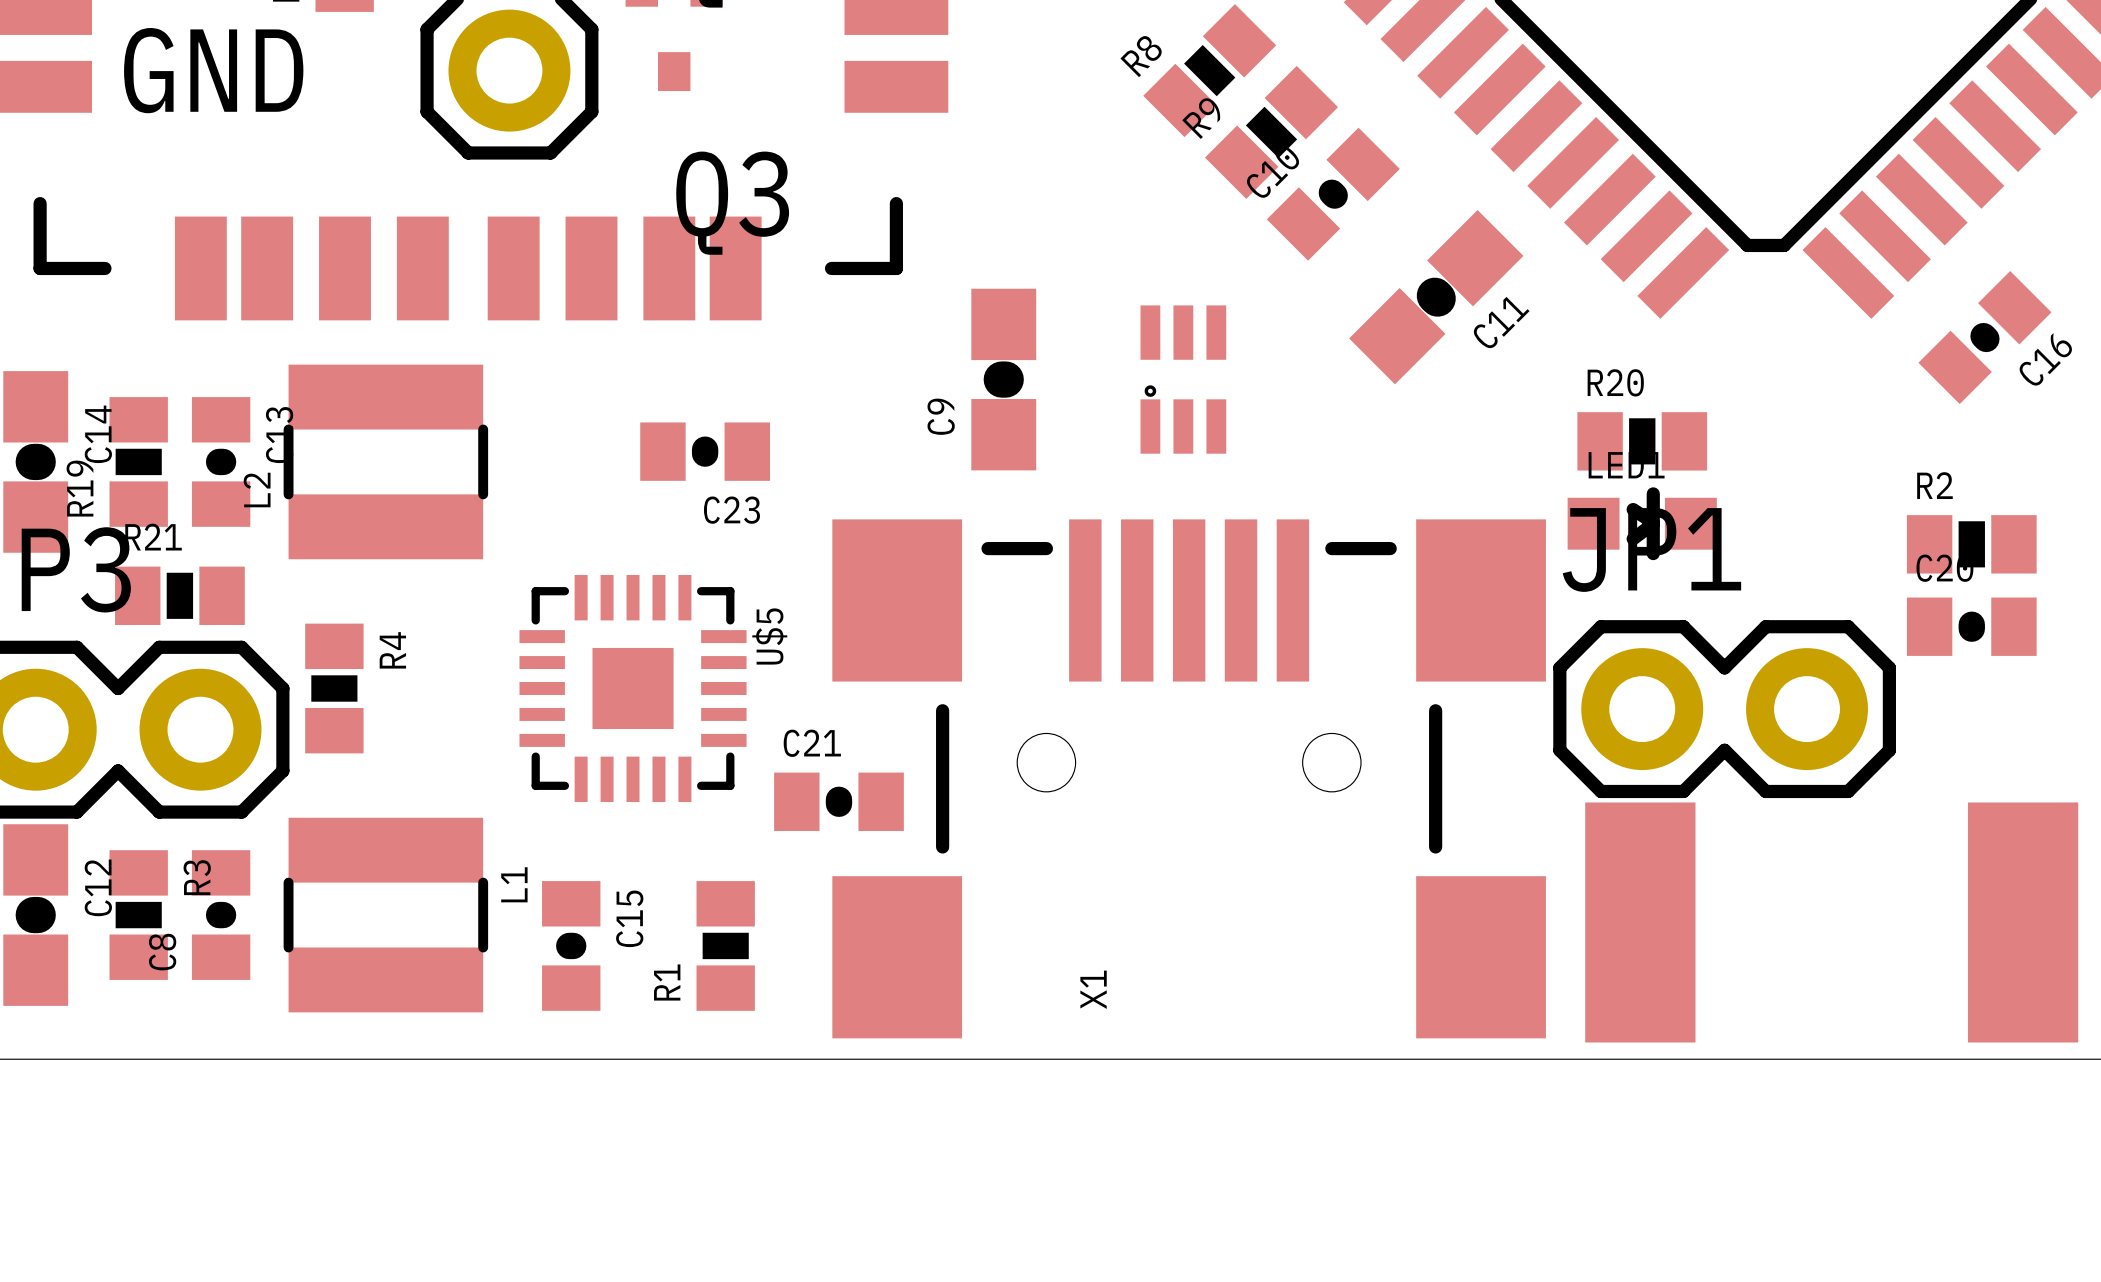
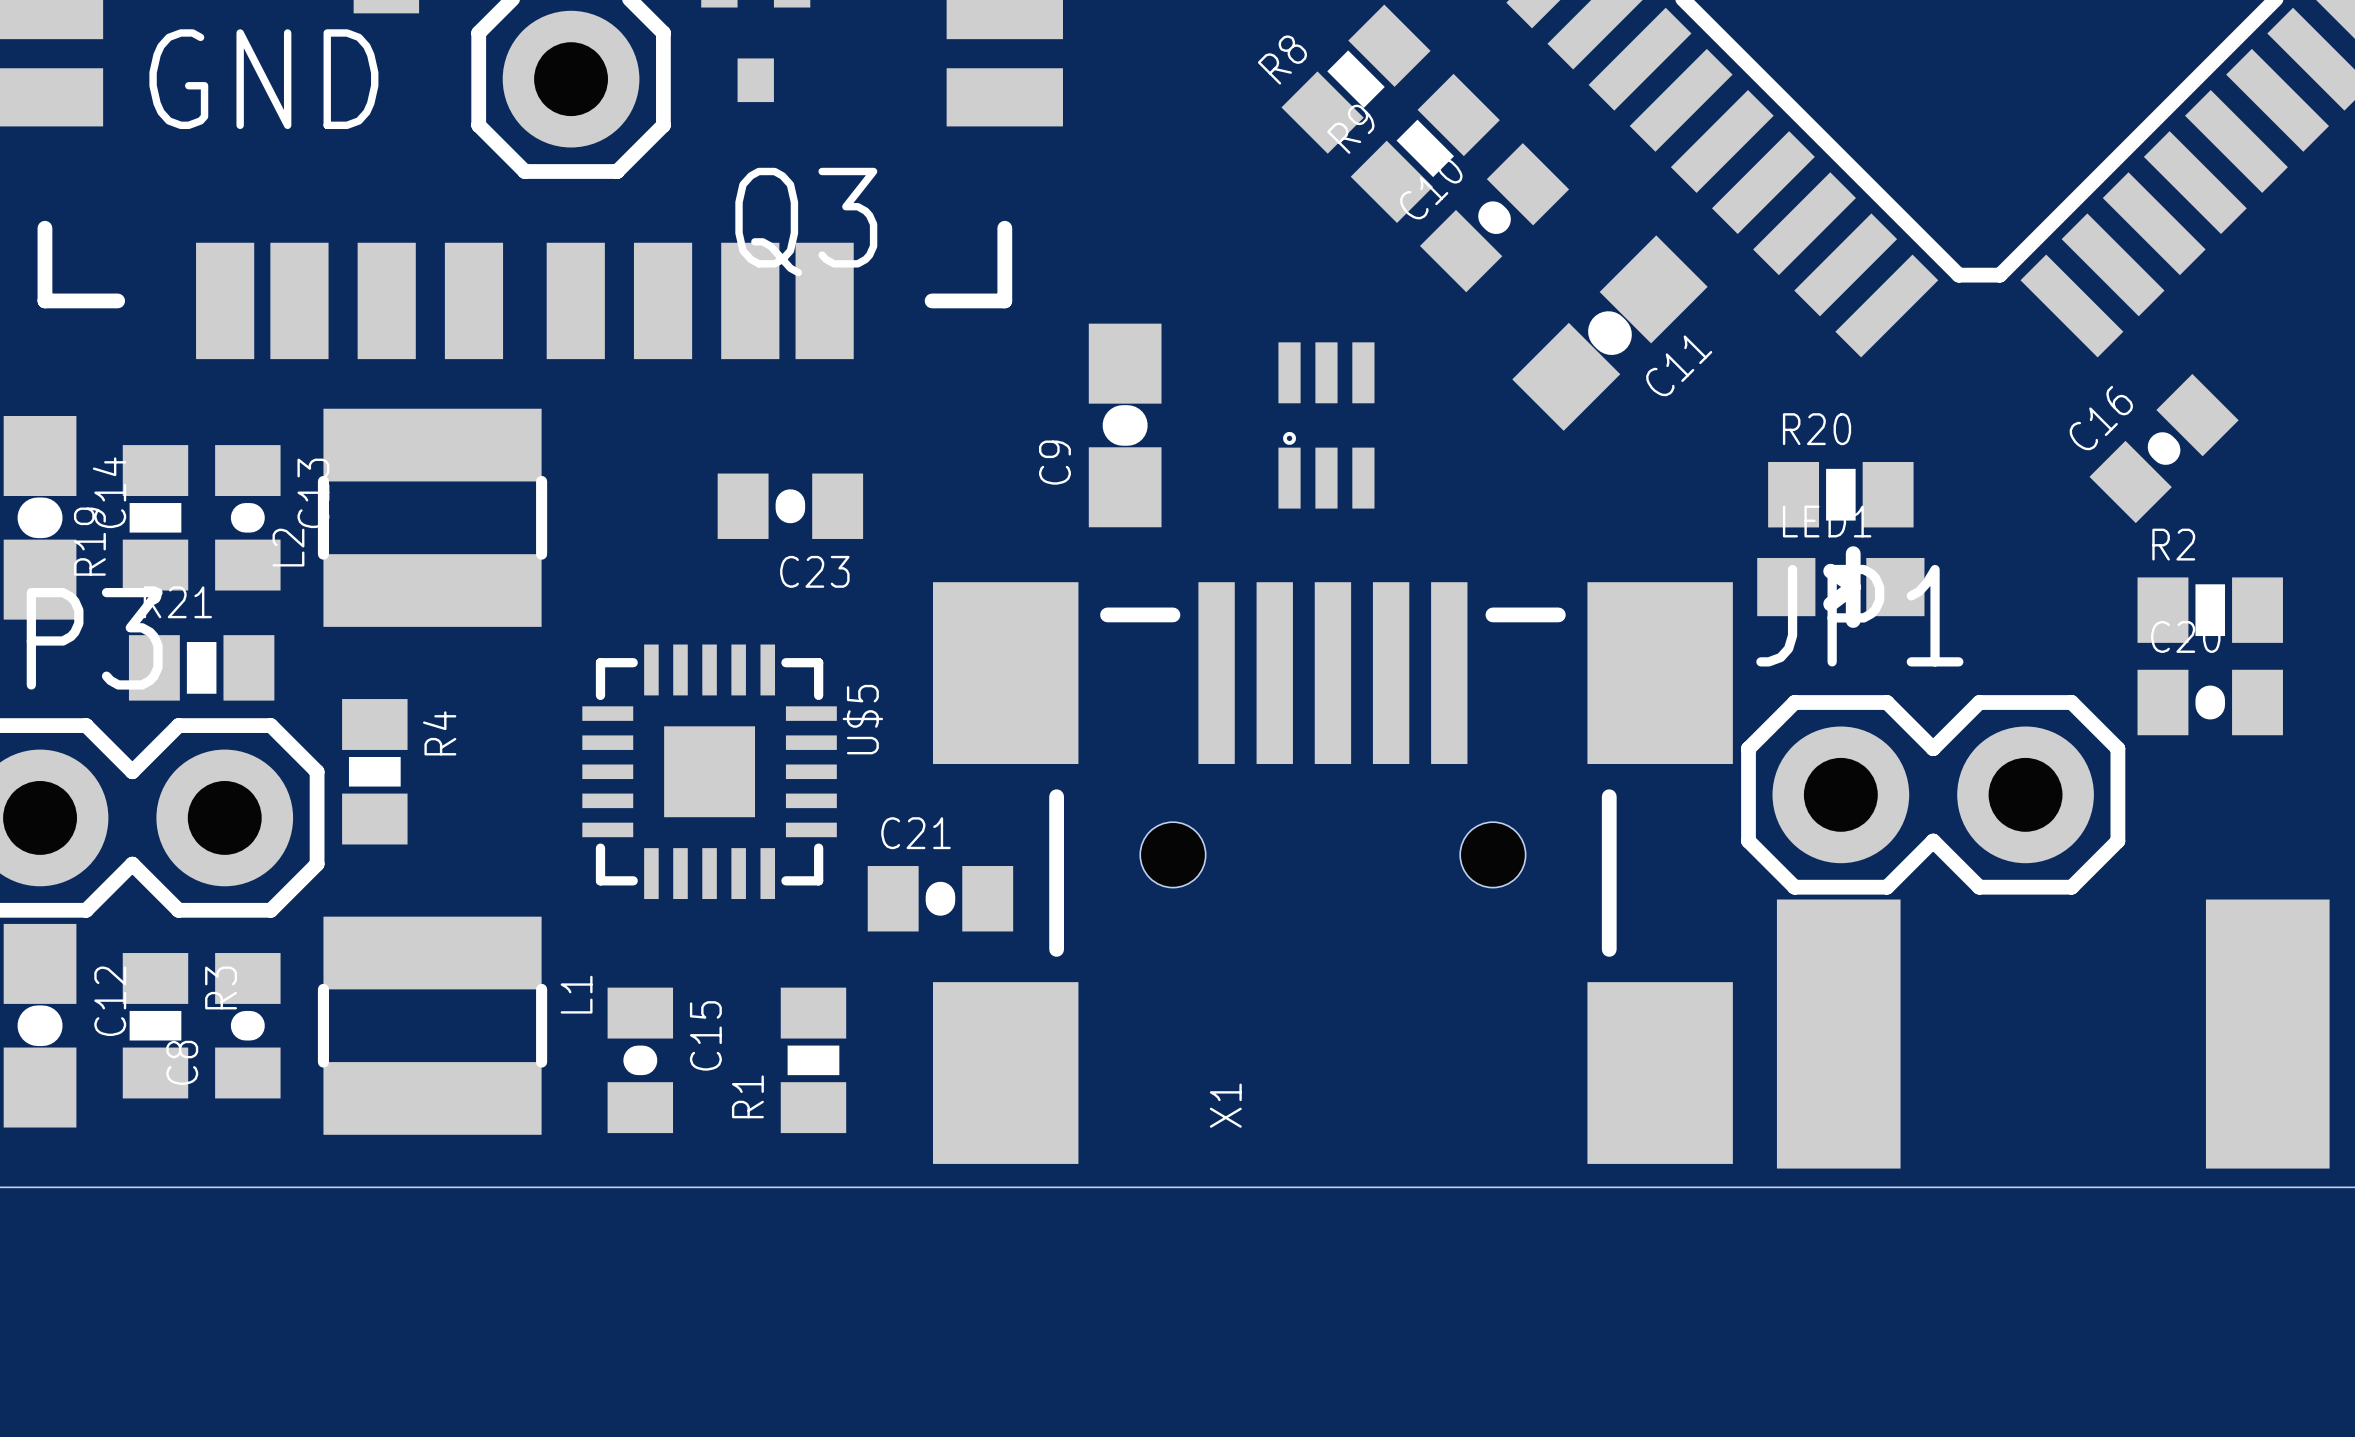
C16 position: (1984, 337) -> (2164, 448)
C16 name position: C16 (2045, 359) -> C16 (2101, 418)

